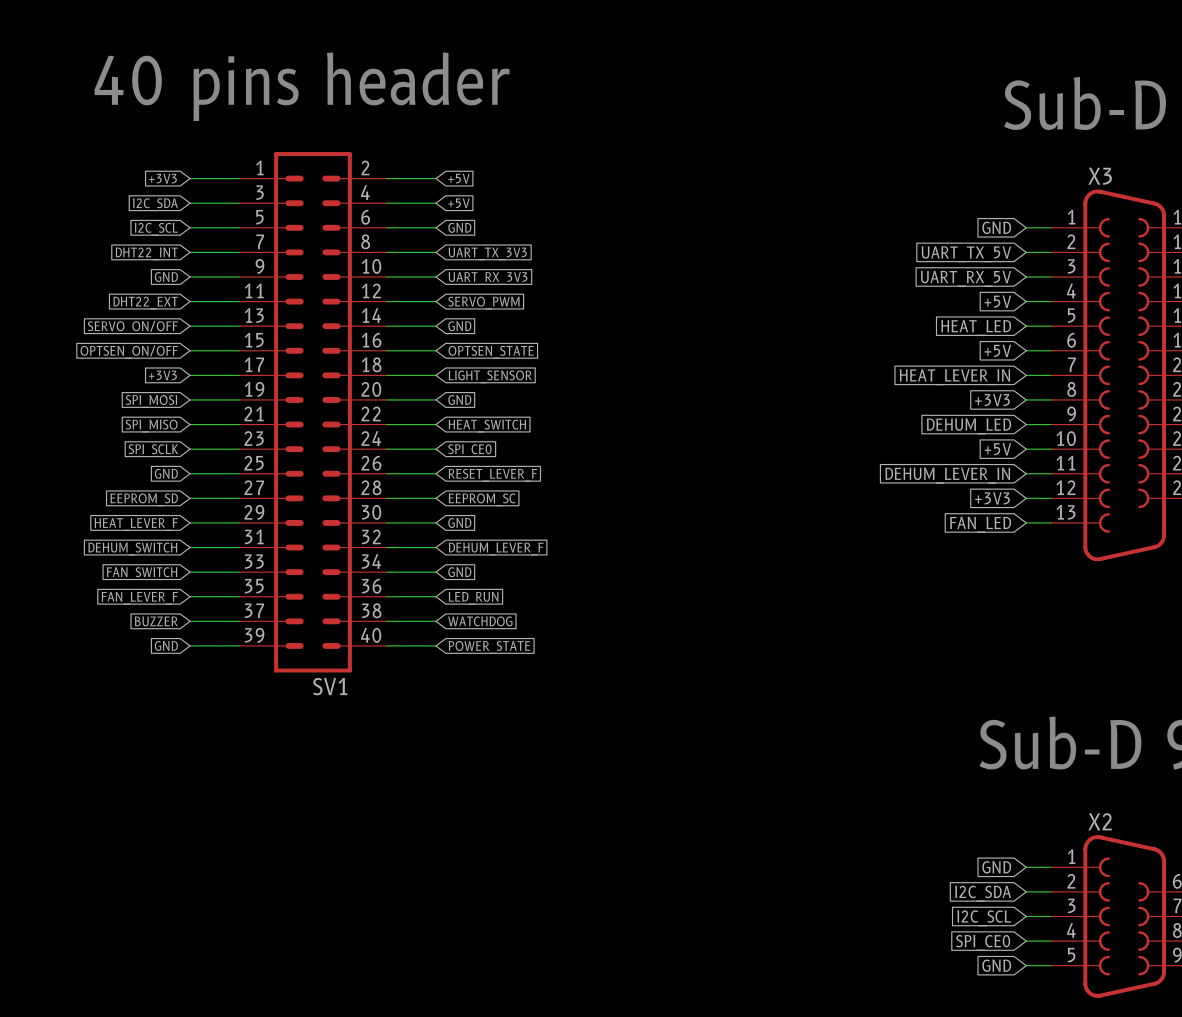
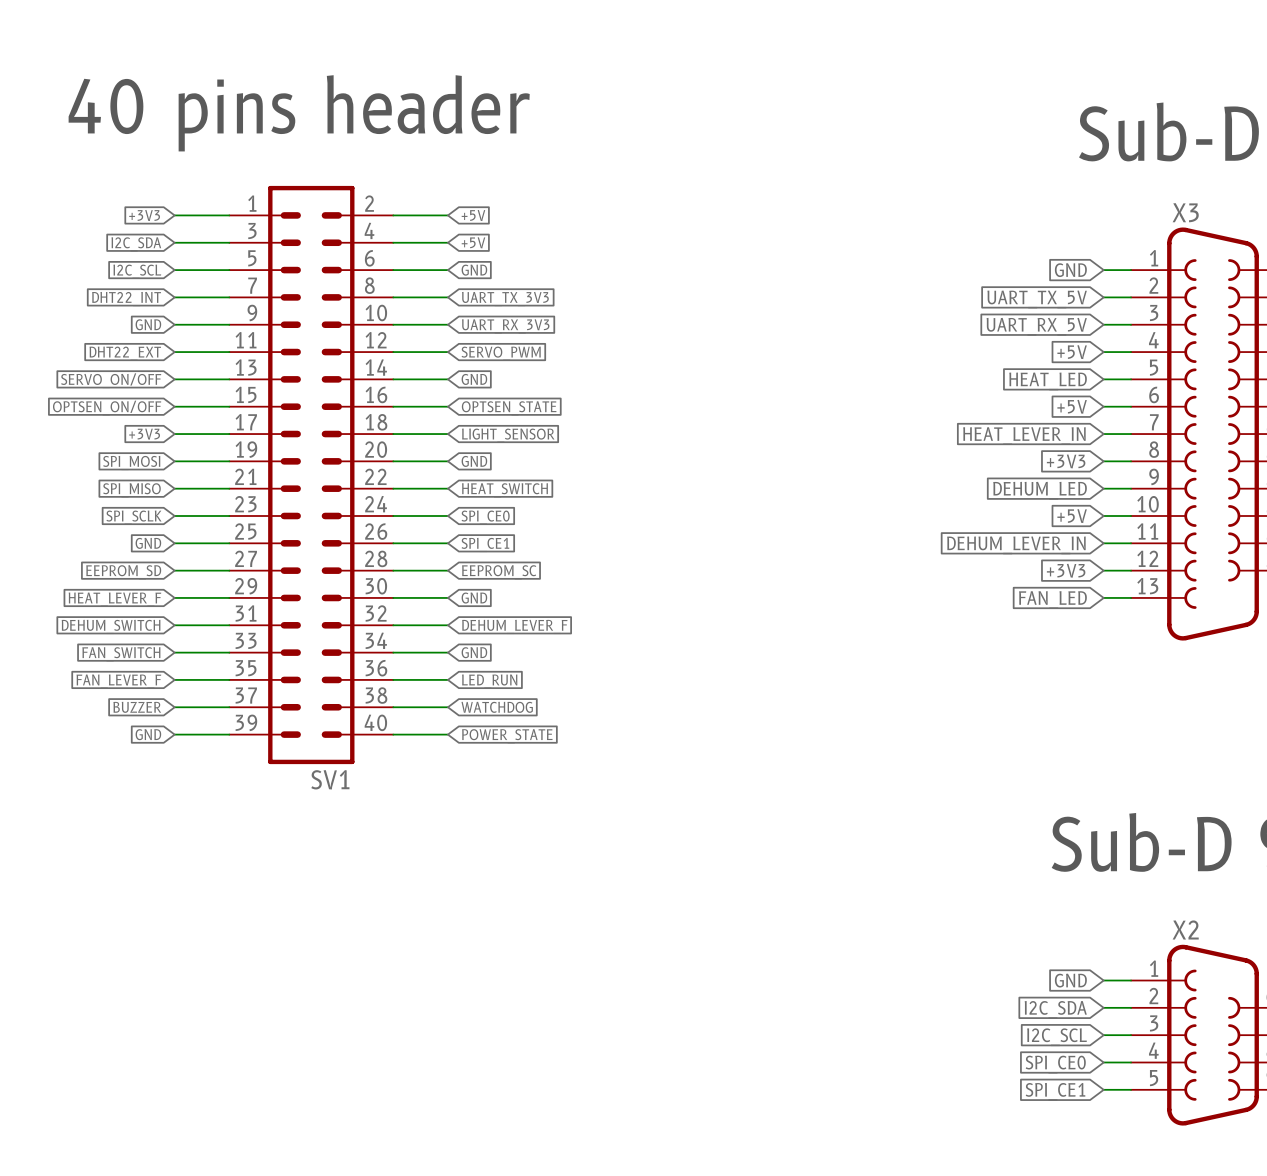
global label: RESET_LEVER_F (492, 475) -> SPI_CE1 (485, 544)
global label: GND (996, 965) -> SPI_CE1 (1055, 1091)

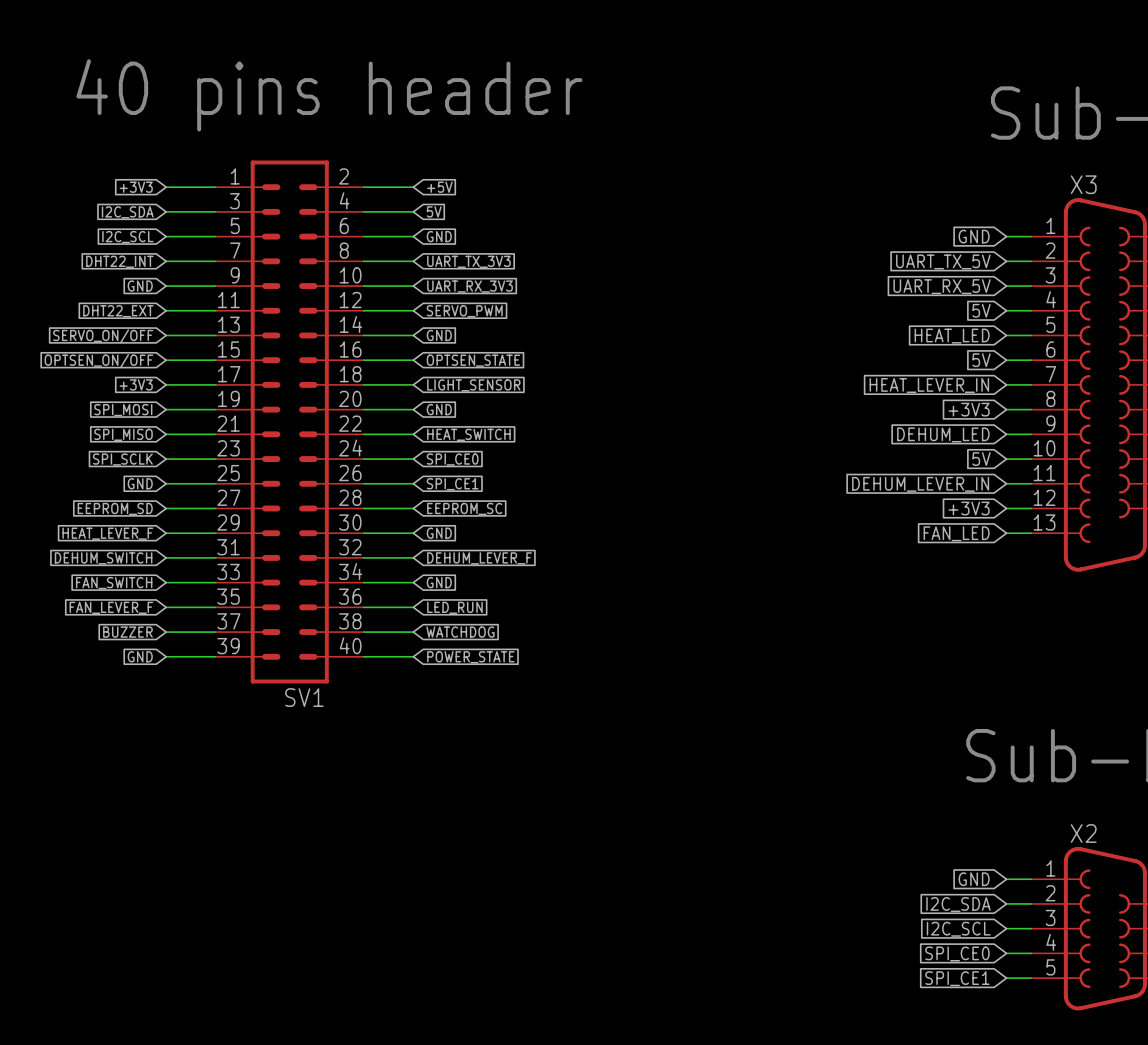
global label: +5V (473, 242) -> 5V (434, 211)
global label: +5V (1072, 352) -> 5V (981, 310)
global label: +5V (1072, 406) -> 5V (981, 360)
global label: +5V (1072, 516) -> 5V (981, 459)

